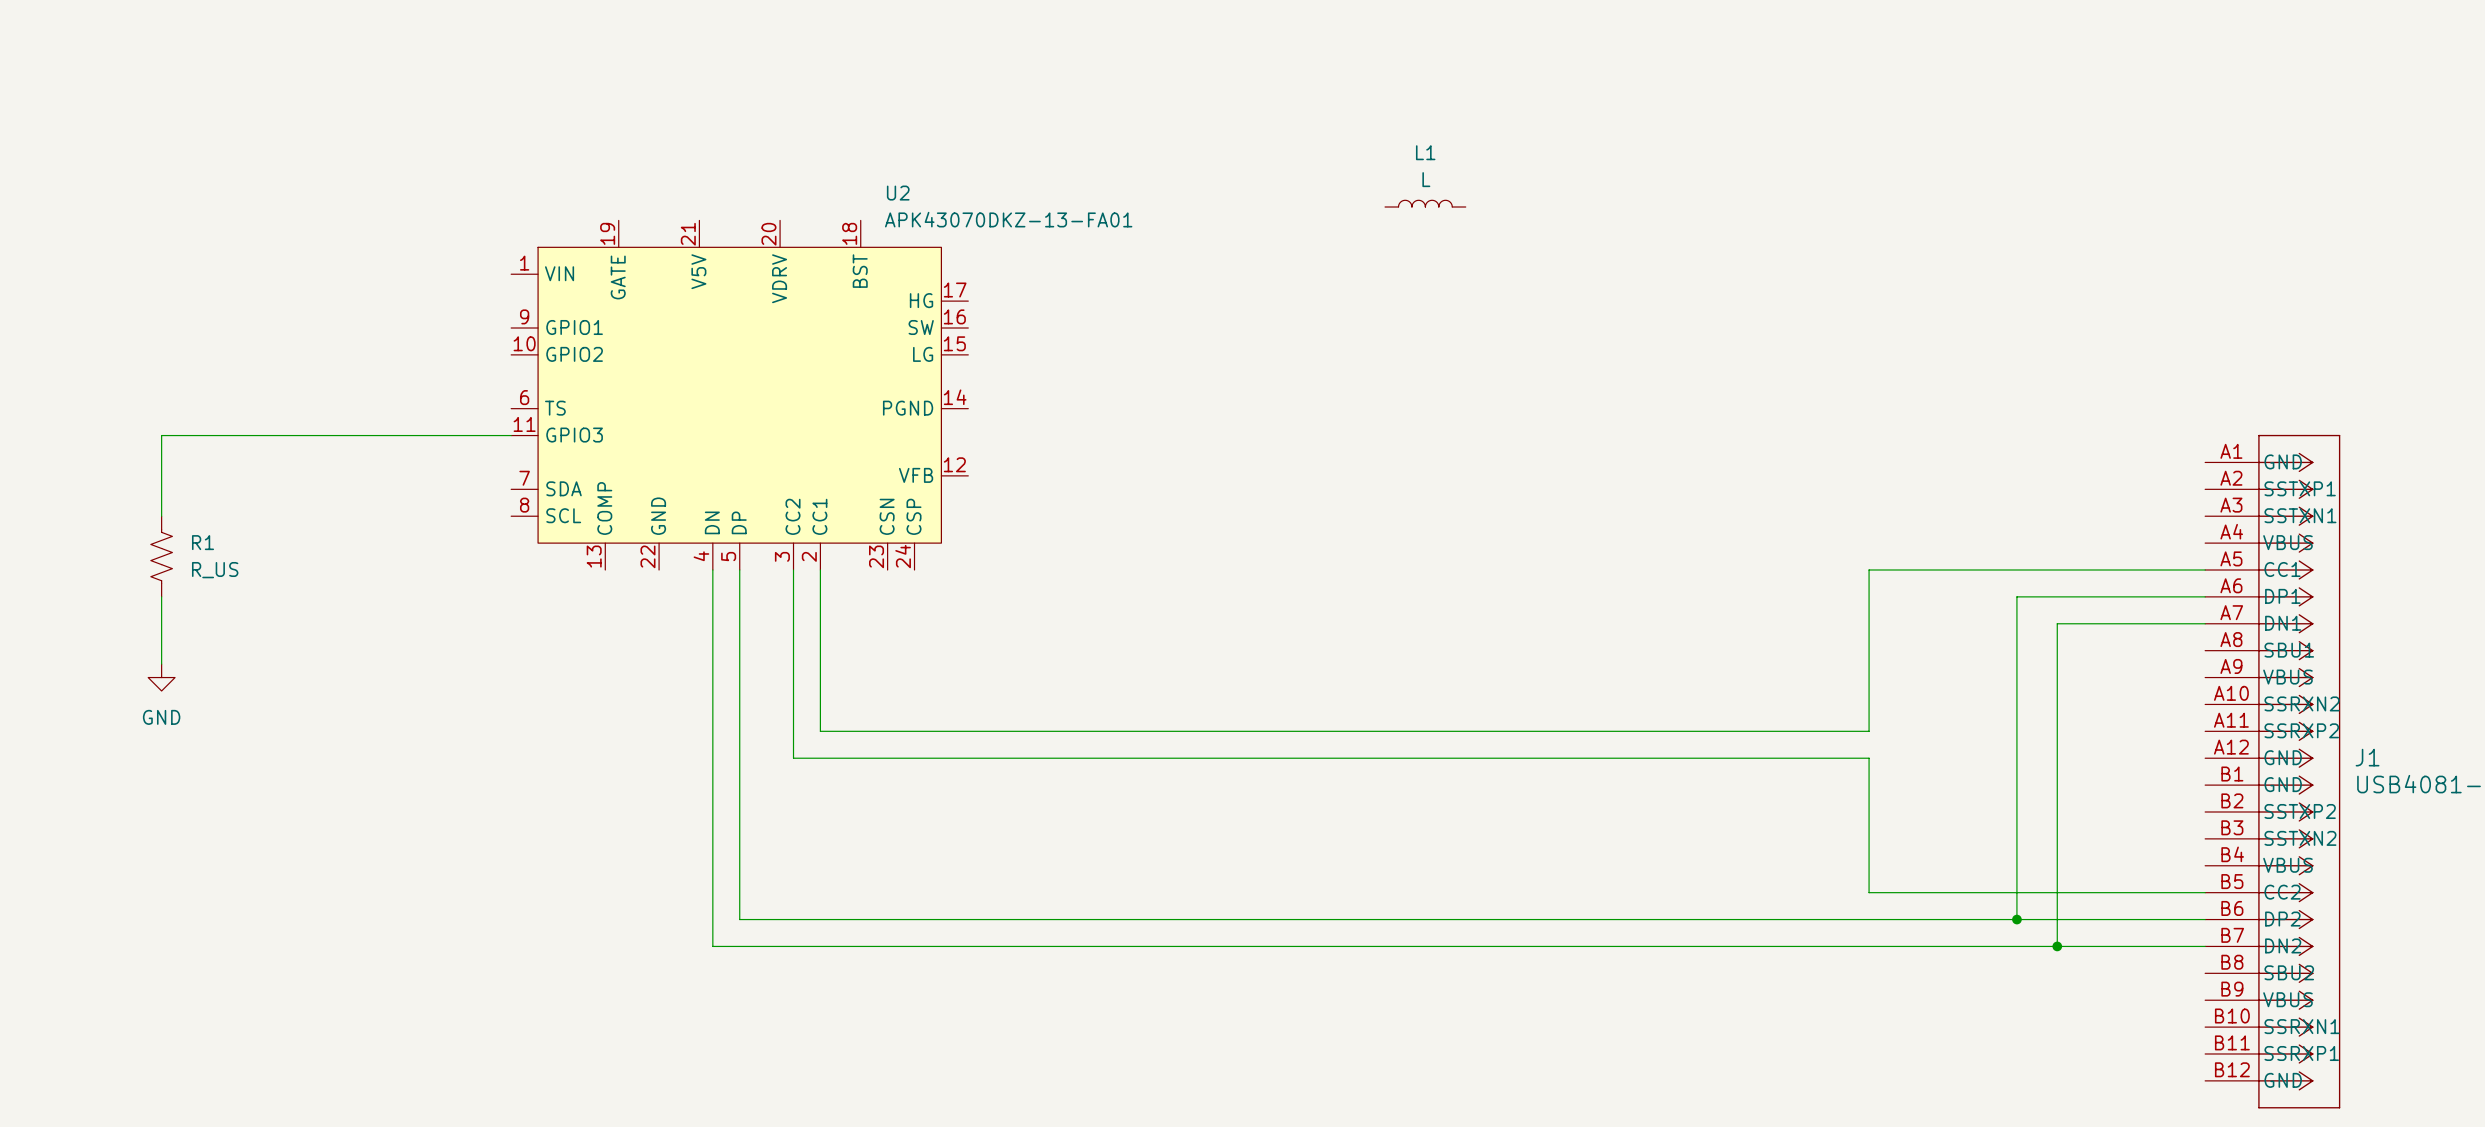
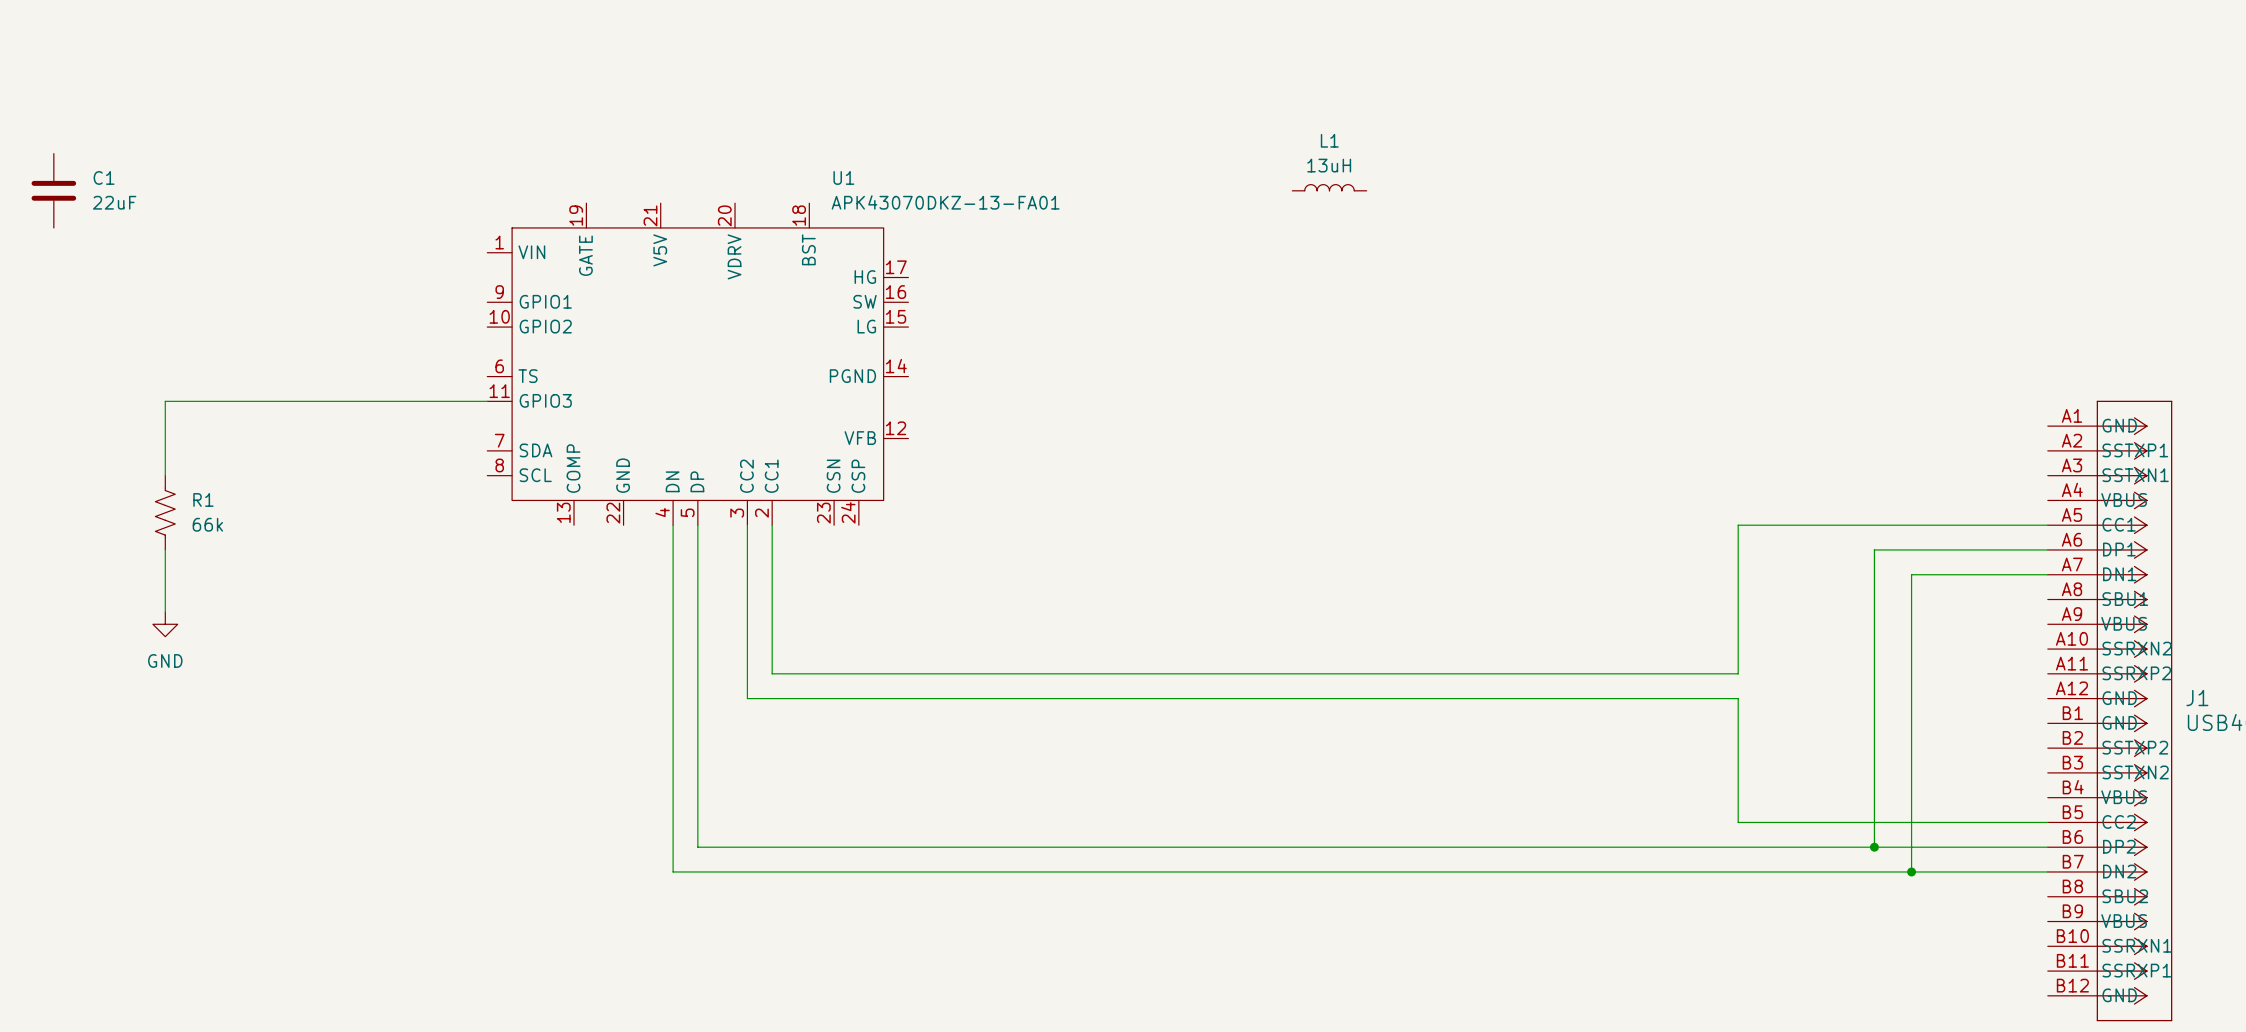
L1 value: L (1426, 179) -> 13uH (1329, 165)
C1: none -> 22uF (53, 190)
U2: APK43070DKZ-13-FA01 (739, 395) -> none
U1: none -> APK43070DKZ-13-FA01 (697, 364)
R1 value: R_US (215, 570) -> 66k (207, 524)

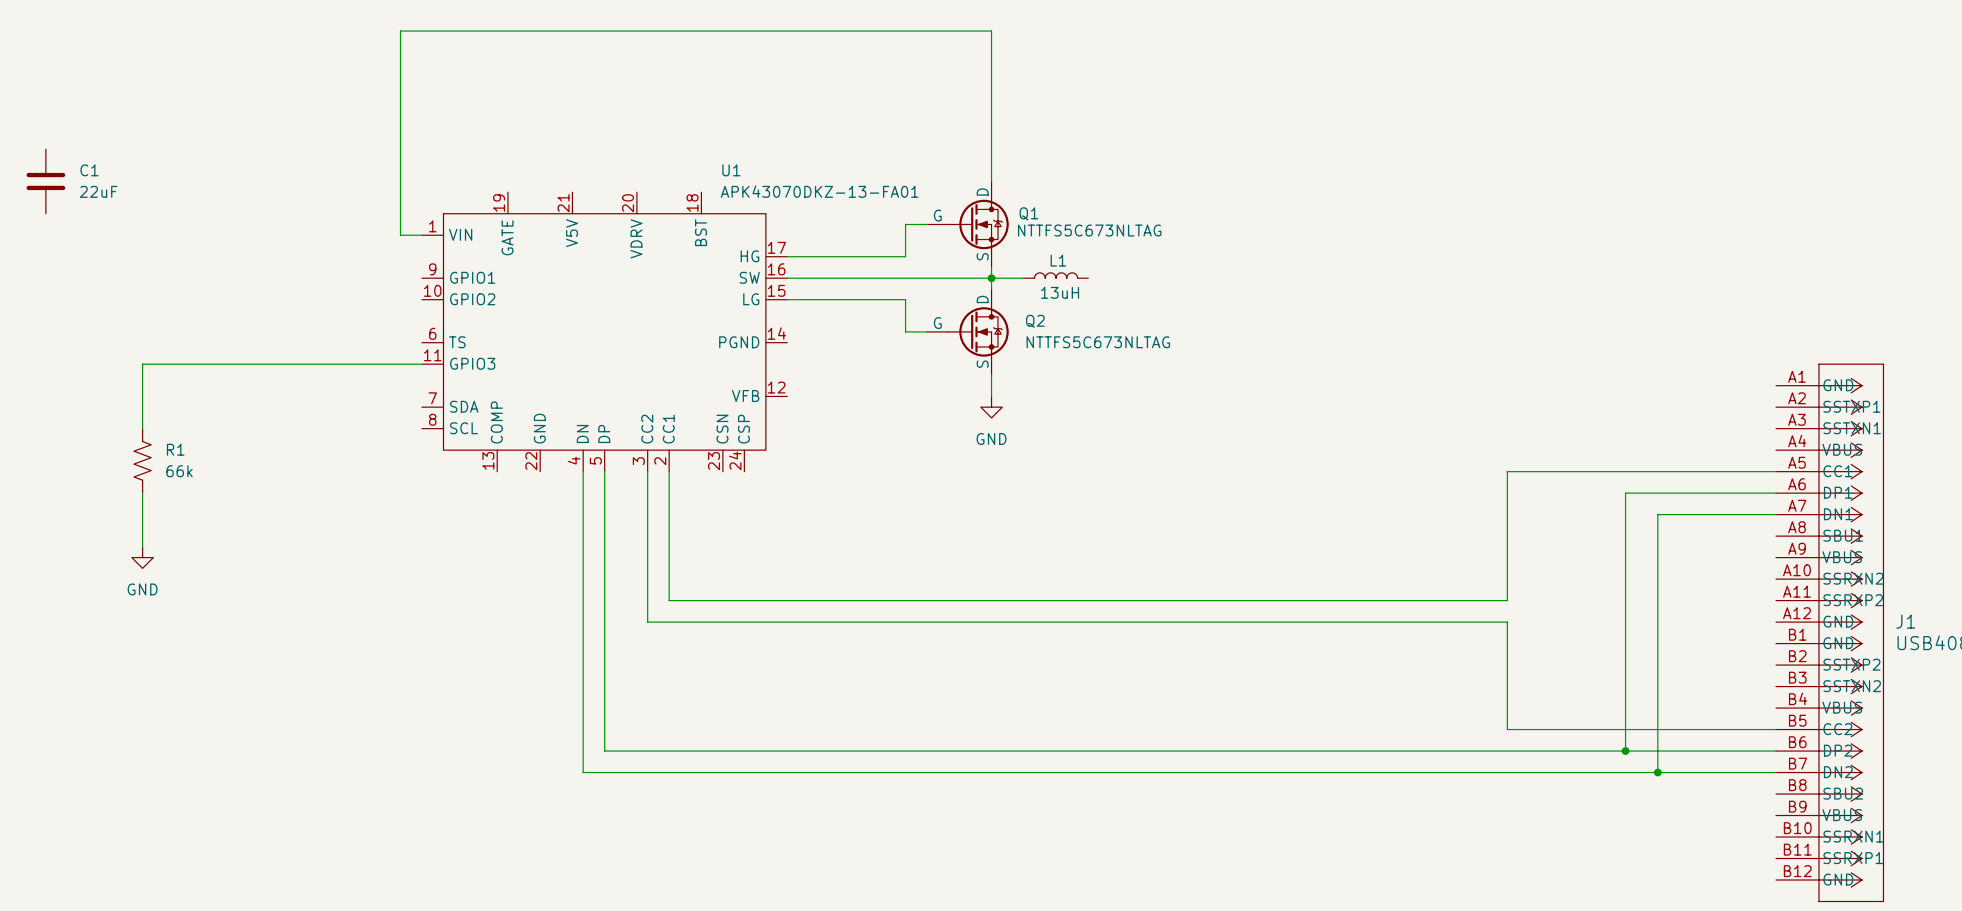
L1 name position: L1 (1329, 140) -> L1 (1058, 260)
L1 value position: 13uH (1329, 165) -> 13uH (1060, 292)
L1 position: (1329, 187) -> (1056, 275)
wire: none -> (991, 181) (991, 31) (400, 31) (400, 235) (421, 235)
wire: none -> (927, 224) (905, 224) (905, 256) (787, 256)
Q1: none -> NTTFS5C673NLTAG (967, 224)
wire: none -> (991, 267) (991, 288)
wire: none -> (787, 278) (1023, 278)
junction: none -> (991, 278)
wire: none -> (787, 299) (905, 299) (905, 331) (927, 331)
Q2: none -> NTTFS5C673NLTAG (967, 331)
wire: none -> (991, 374) (991, 396)
power symbol: none -> GND (991, 407)

